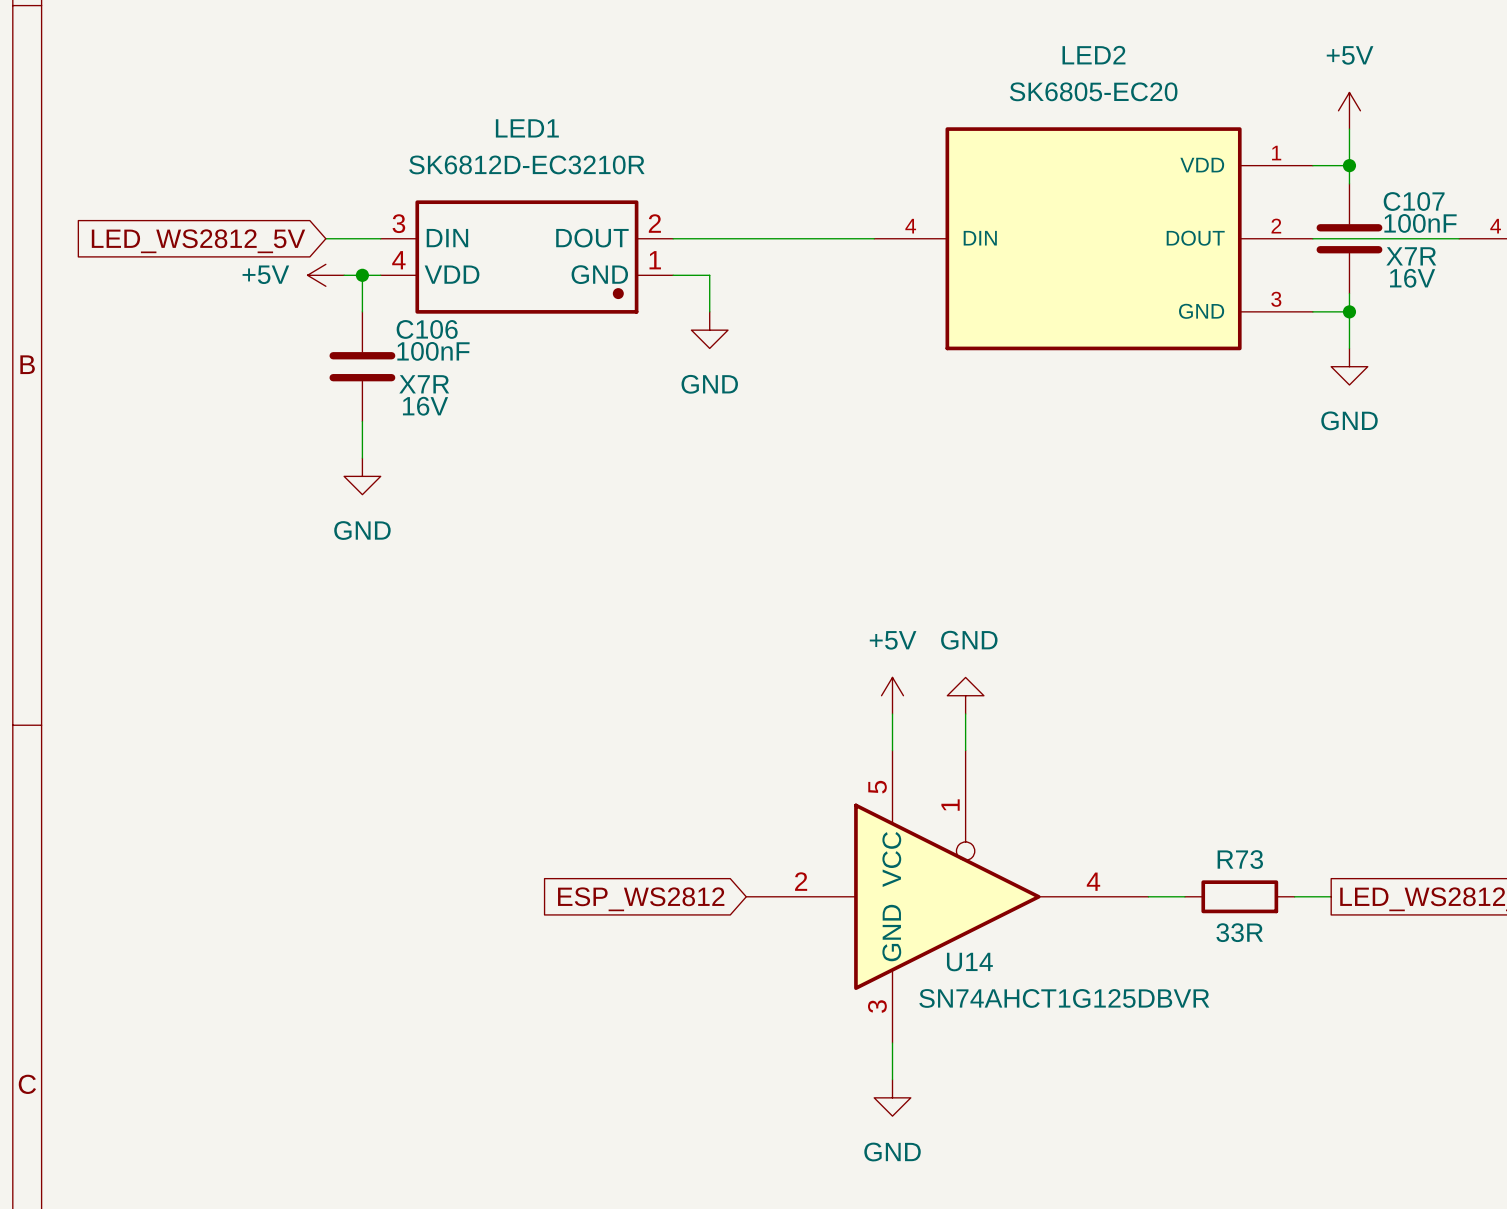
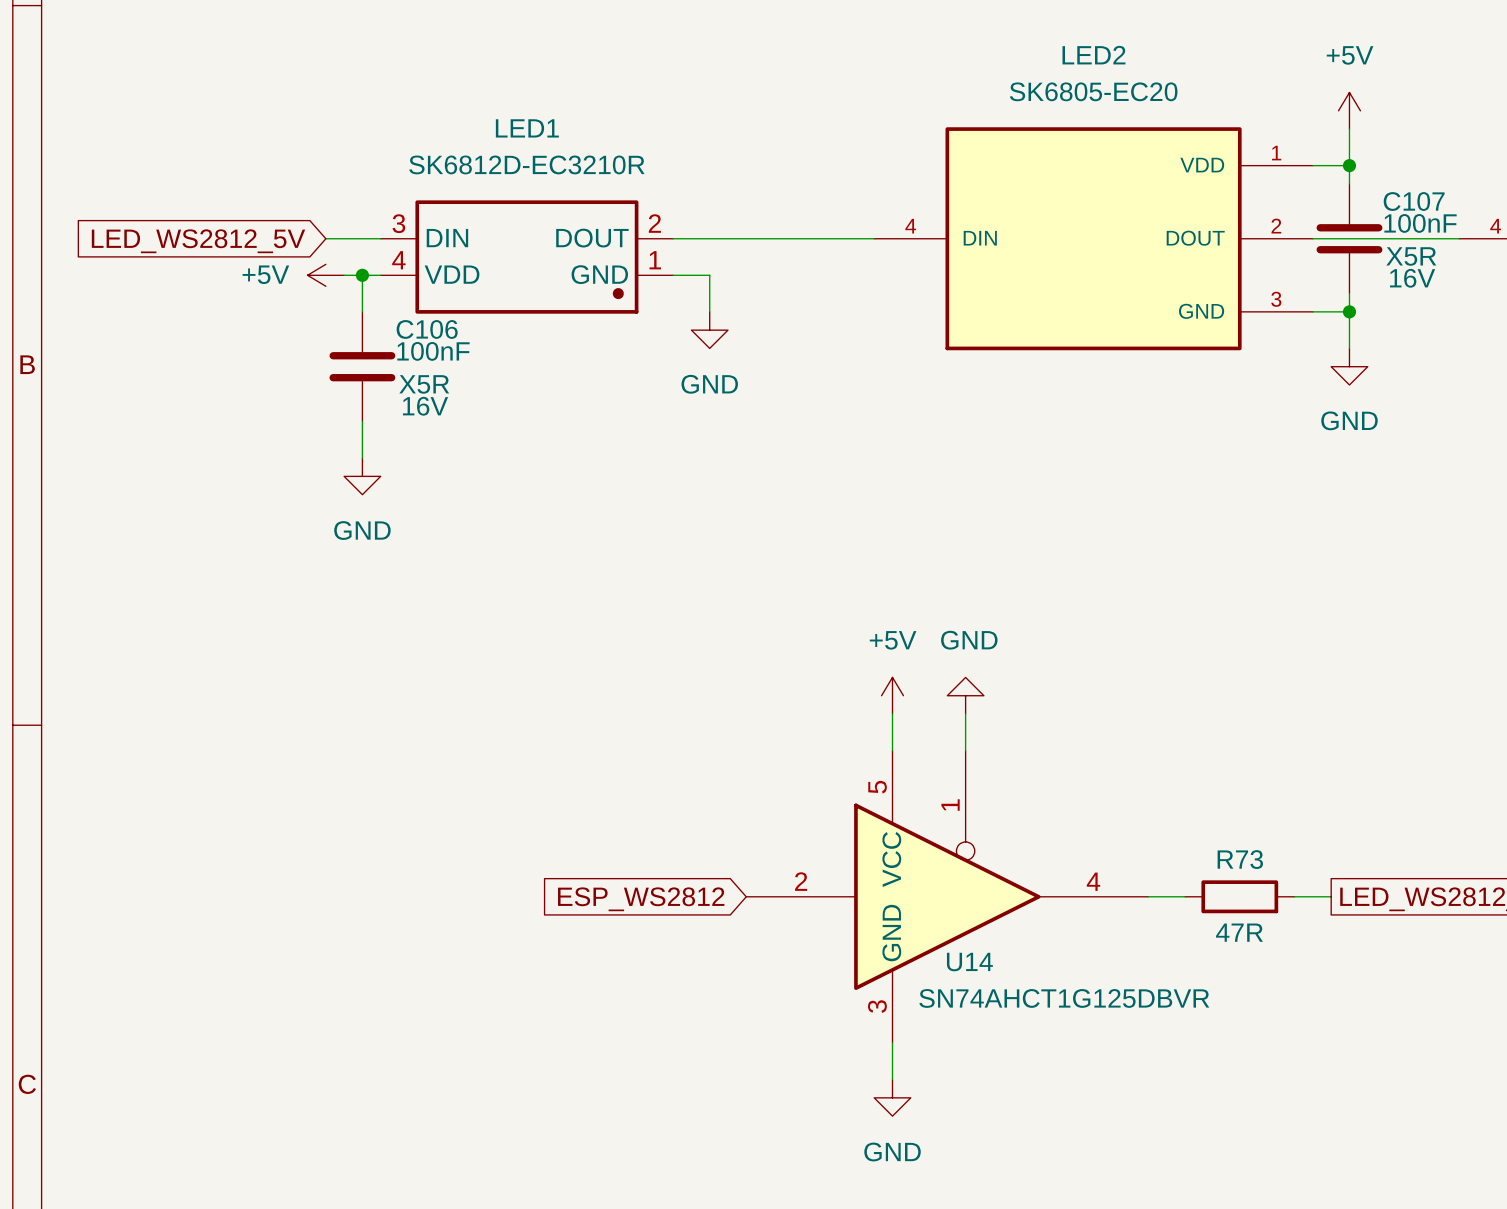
C107 text: X7R (1411, 256) -> X5R (1411, 256)
C106 text: X7R (424, 384) -> X5R (424, 384)
R73 value: 33R (1239, 932) -> 47R (1239, 932)

